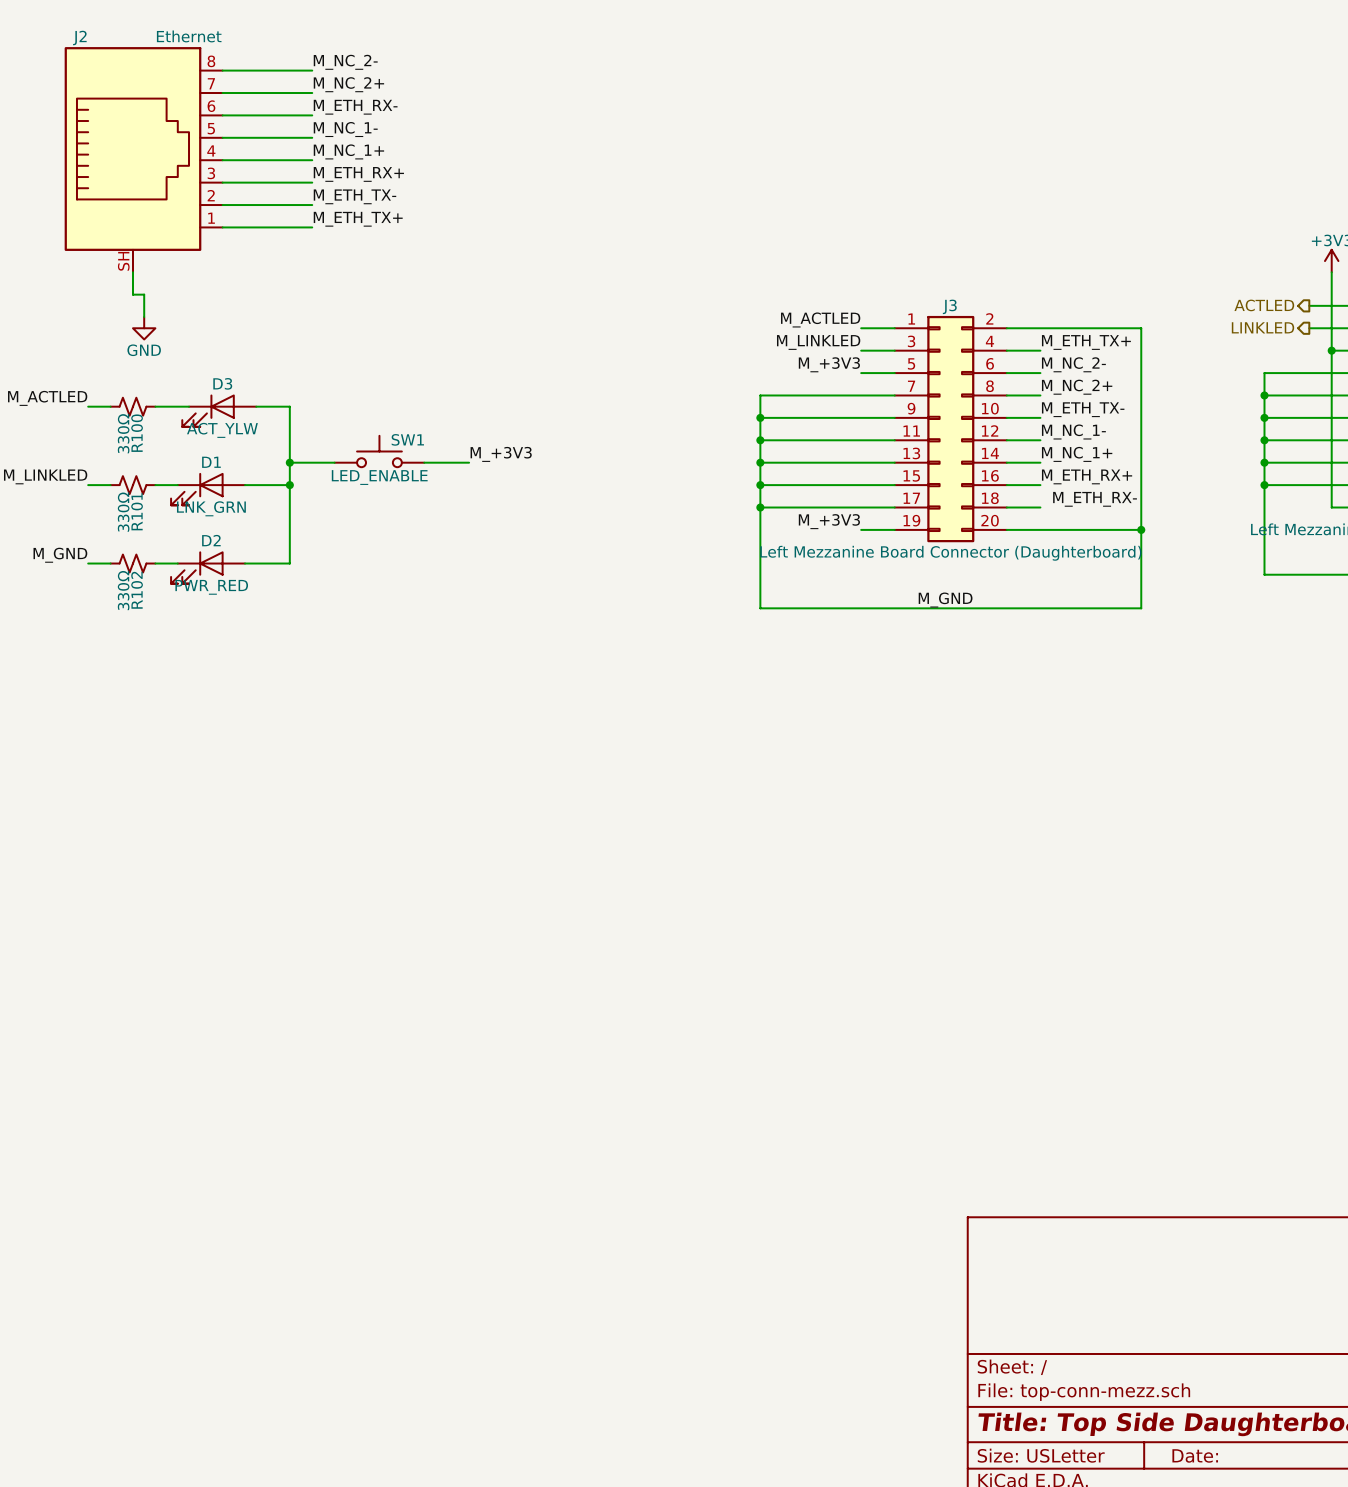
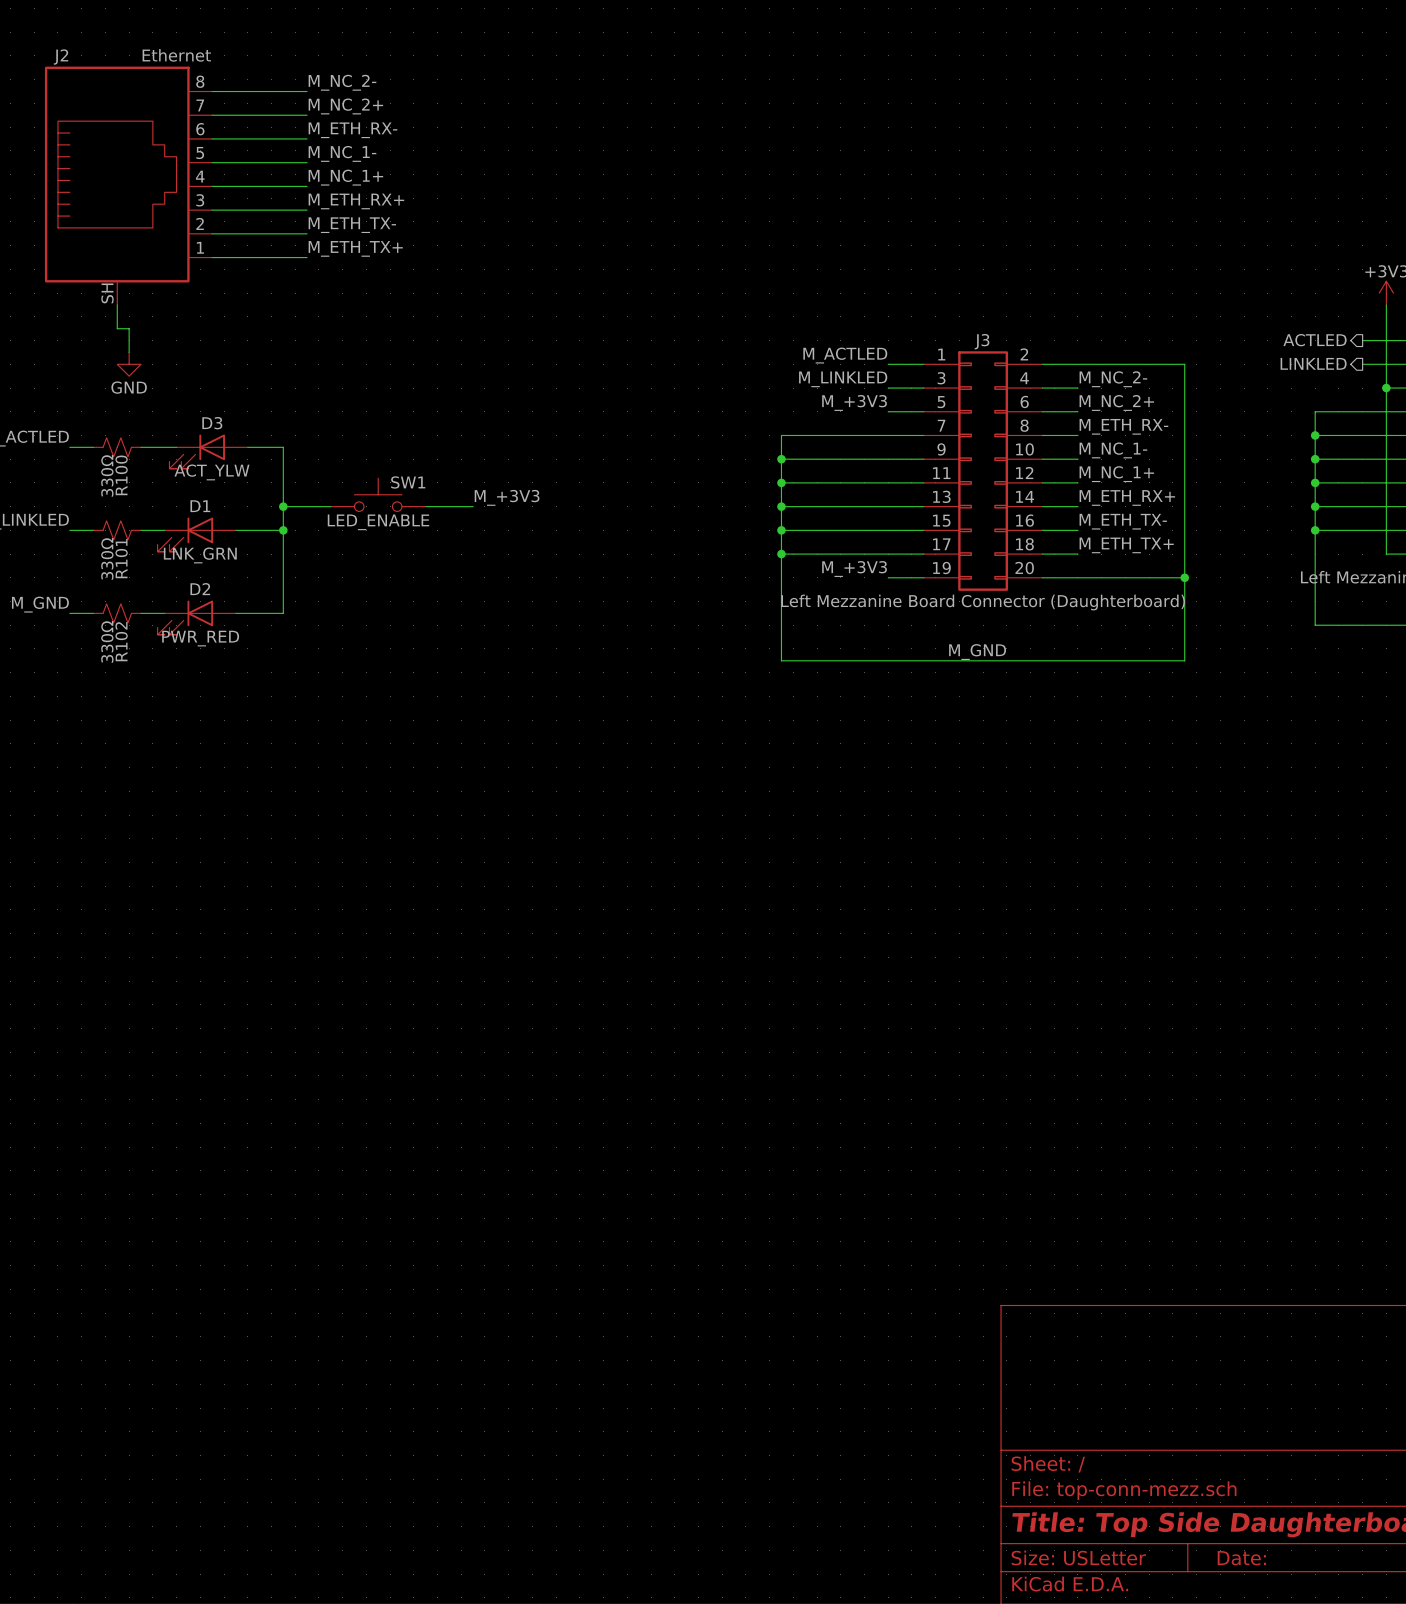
label: M_ETH_TX+ (1086, 342) -> M_NC_2- (1113, 379)
label: M_NC_2- (1073, 364) -> M_NC_2+ (1116, 402)
label: M_NC_2+ (1077, 387) -> M_ETH_RX- (1123, 426)
label: M_ETH_TX- (1083, 409) -> M_NC_1- (1113, 450)
label: M_NC_1- (1073, 432) -> M_NC_1+ (1116, 474)
label: M_NC_1+ (1077, 454) -> M_ETH_RX+ (1127, 497)
label: M_ETH_RX+ (1087, 476) -> M_ETH_TX- (1123, 521)
label: M_ETH_RX- (1095, 499) -> M_ETH_TX+ (1126, 545)

